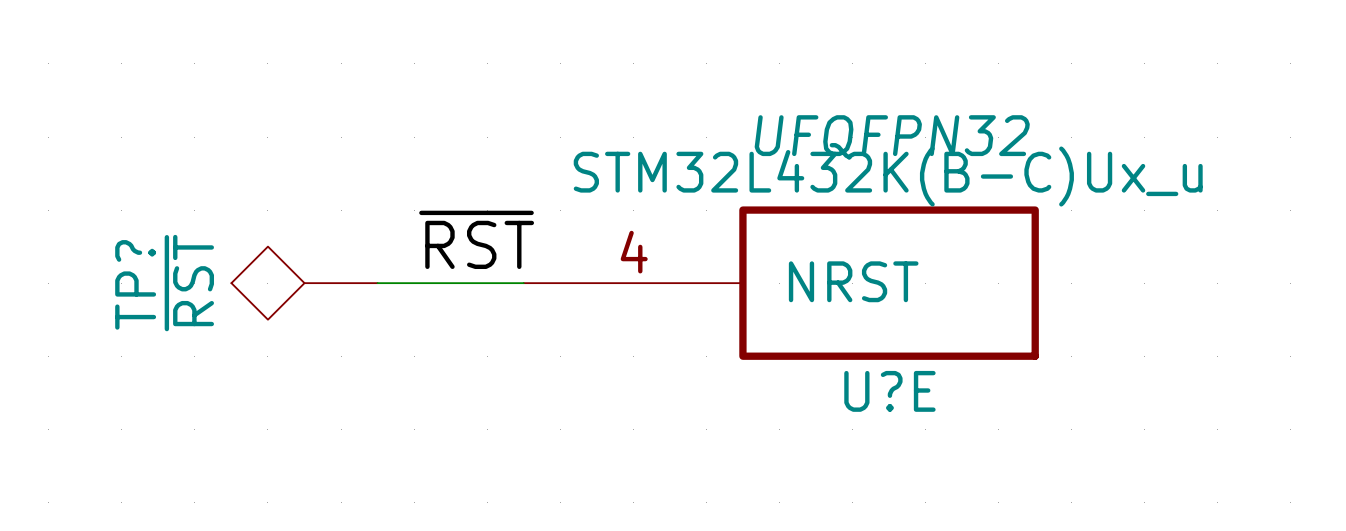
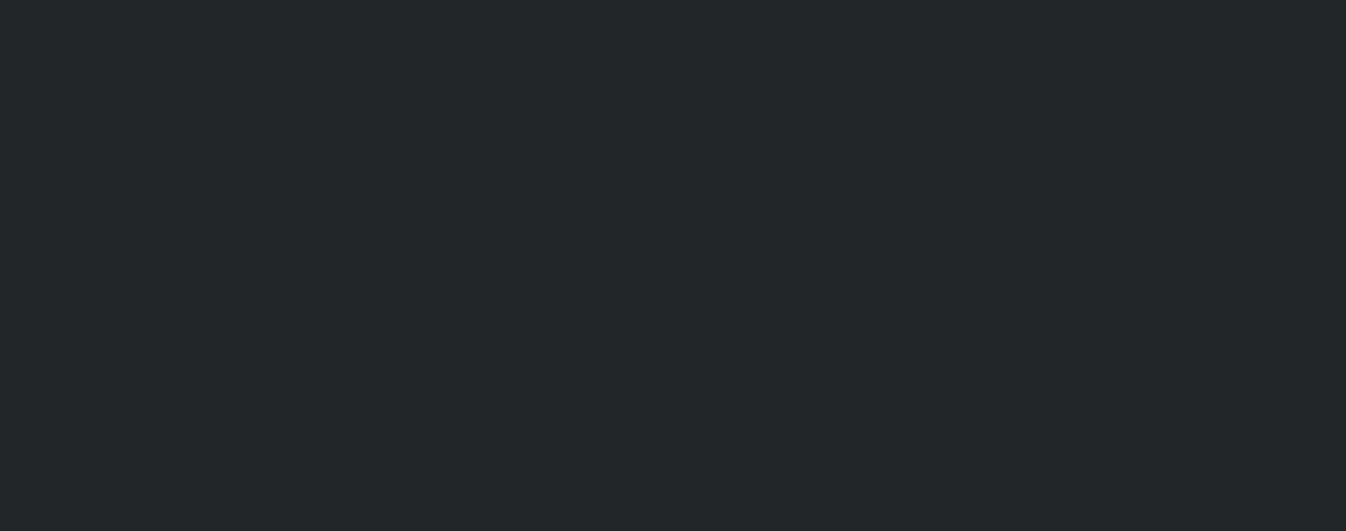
label: ~{RST} (476, 239) -> none
TP?: ~{RST} (304, 283) -> none
wire: (377, 283) (523, 283) -> none
U?E: STM32L432K(B-C)Ux_u (781, 283) -> none

